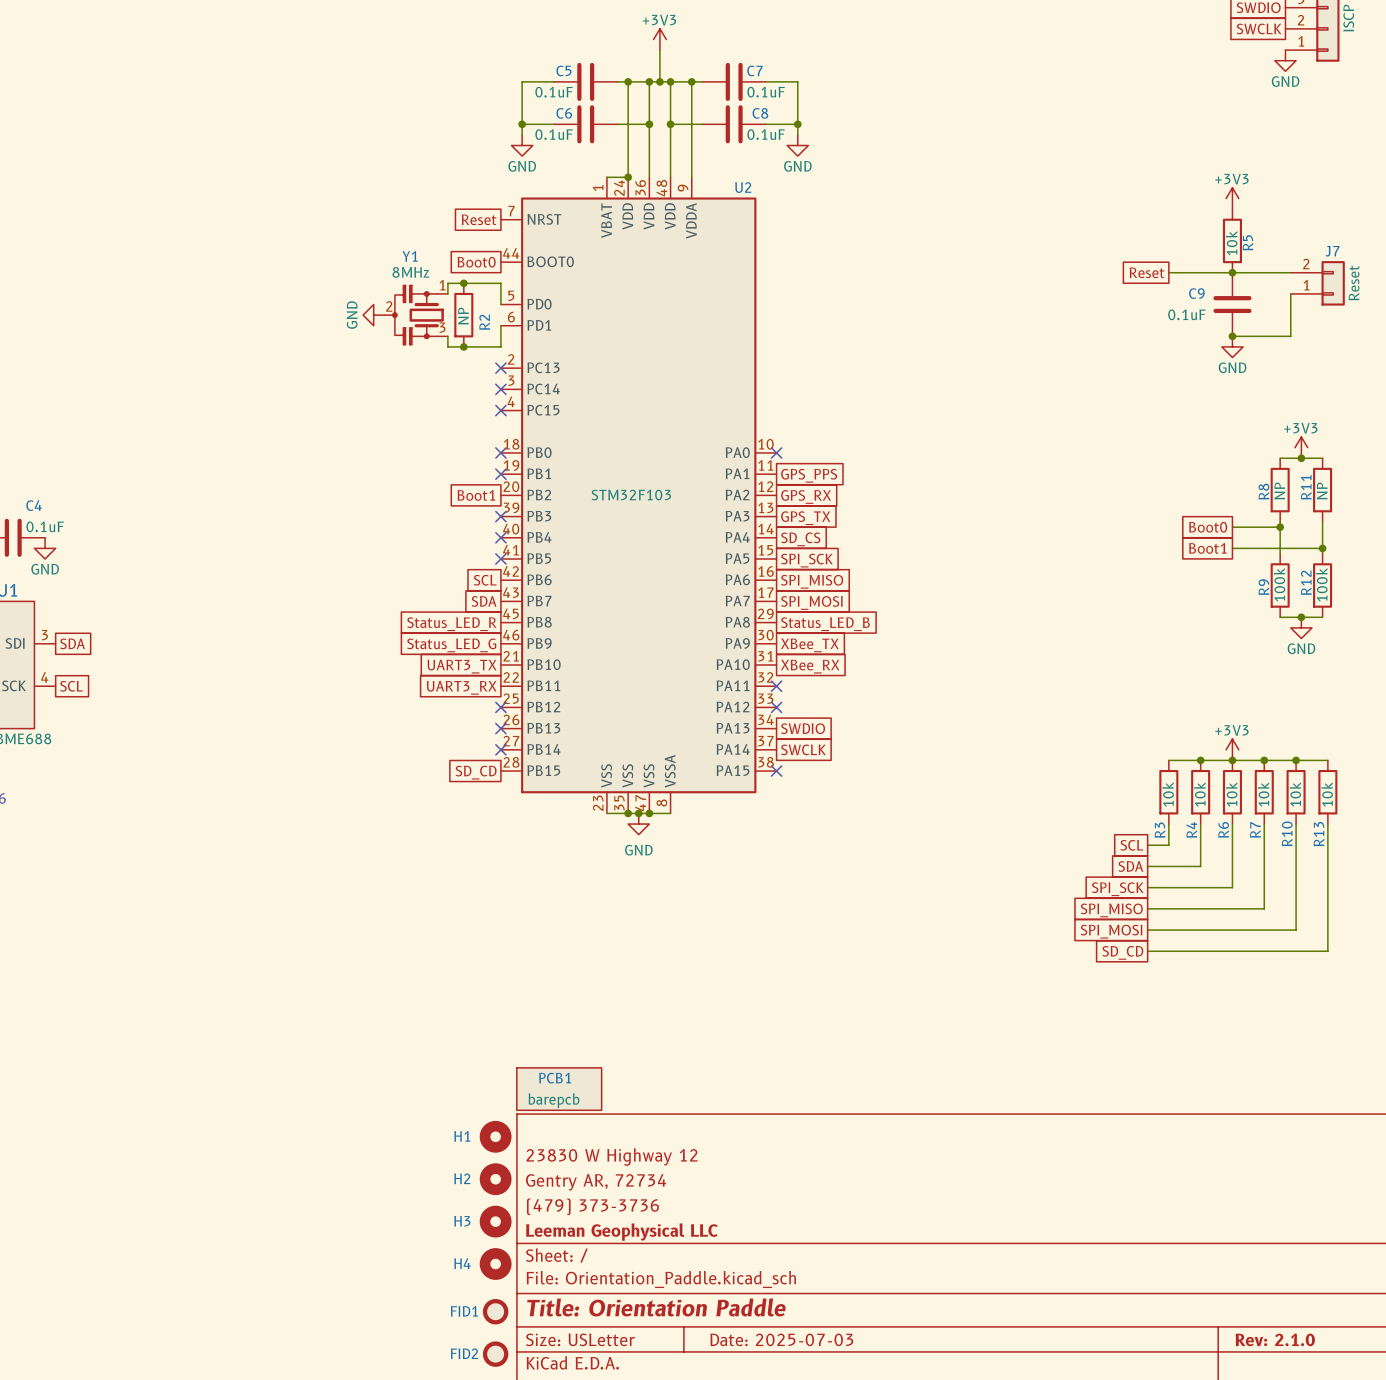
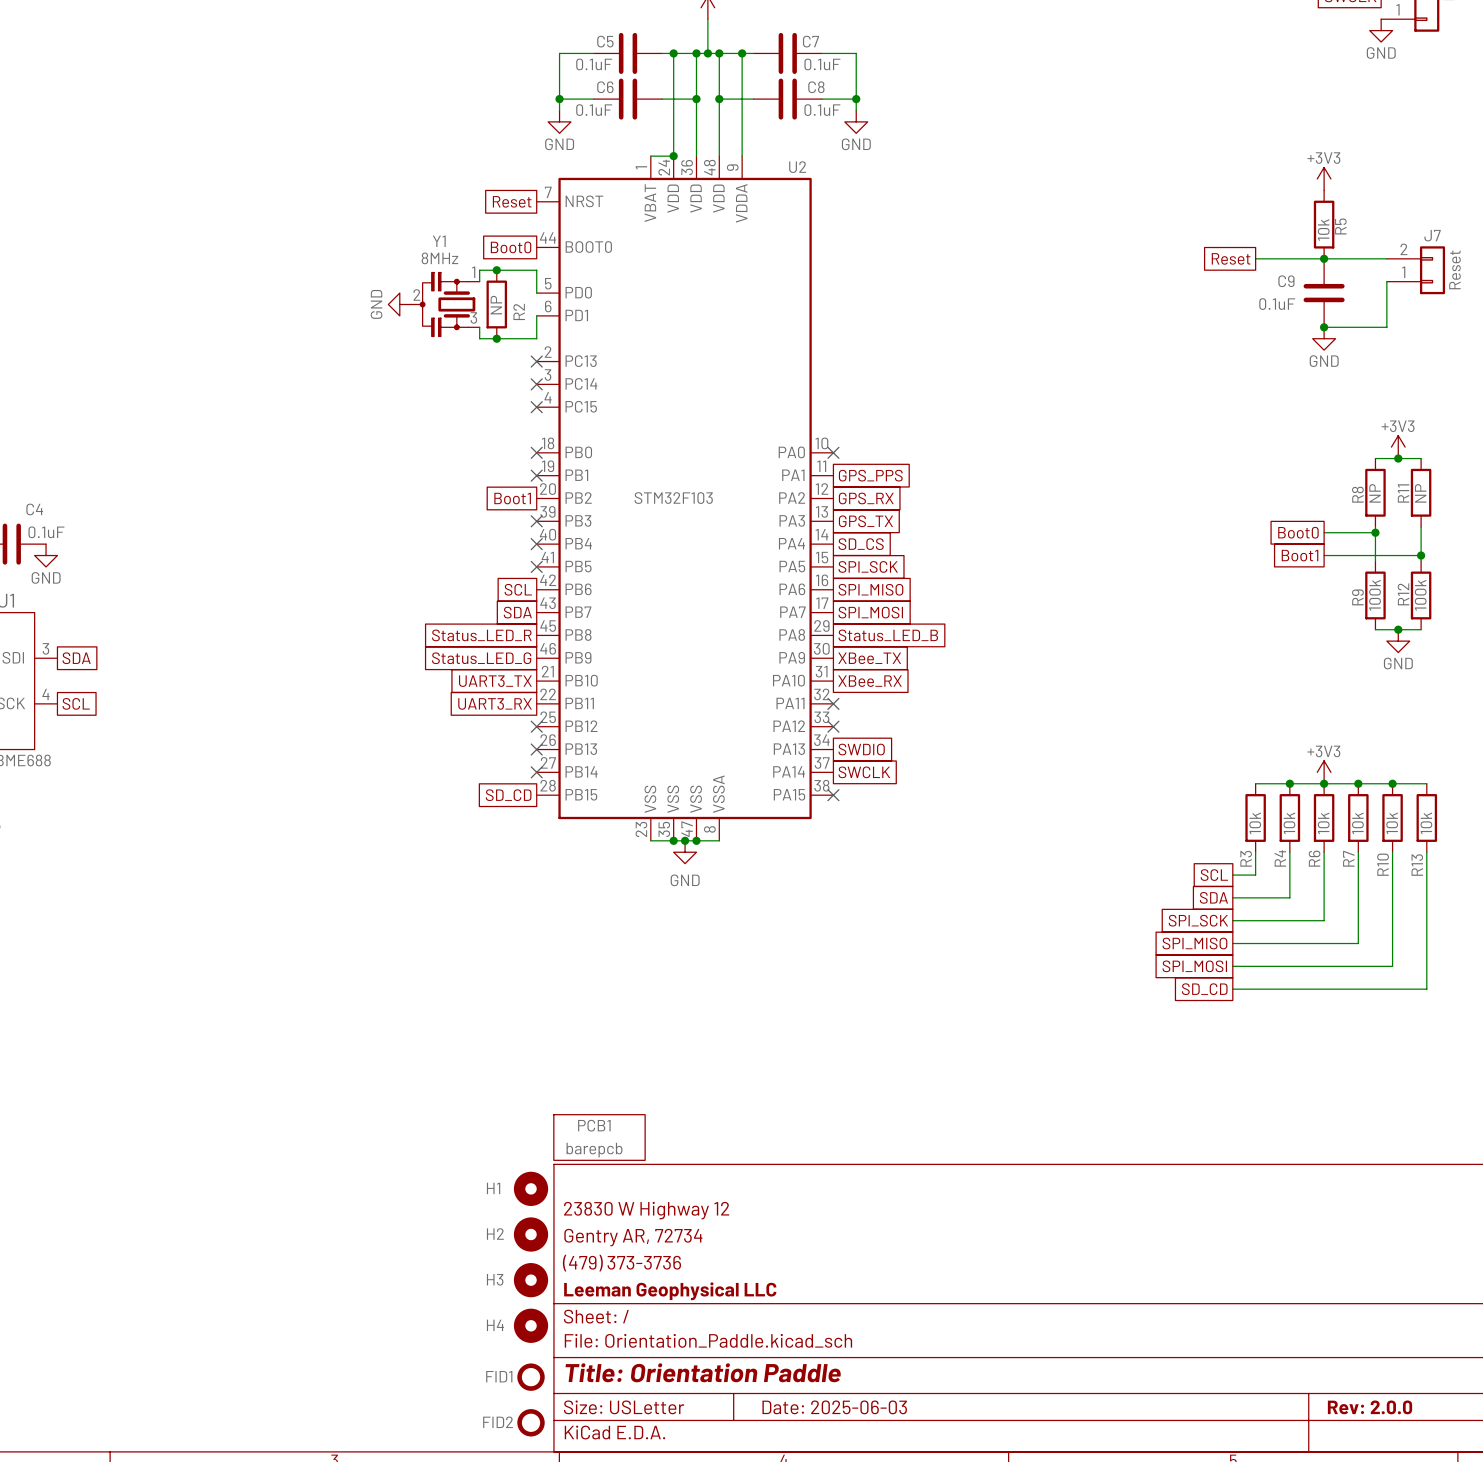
title block: Date: 2025-07-03 (781, 1339) -> Date: 2025-06-03 (834, 1407)
title block: Rev: 2.1.0 (1275, 1339) -> Rev: 2.0.0 (1370, 1407)

